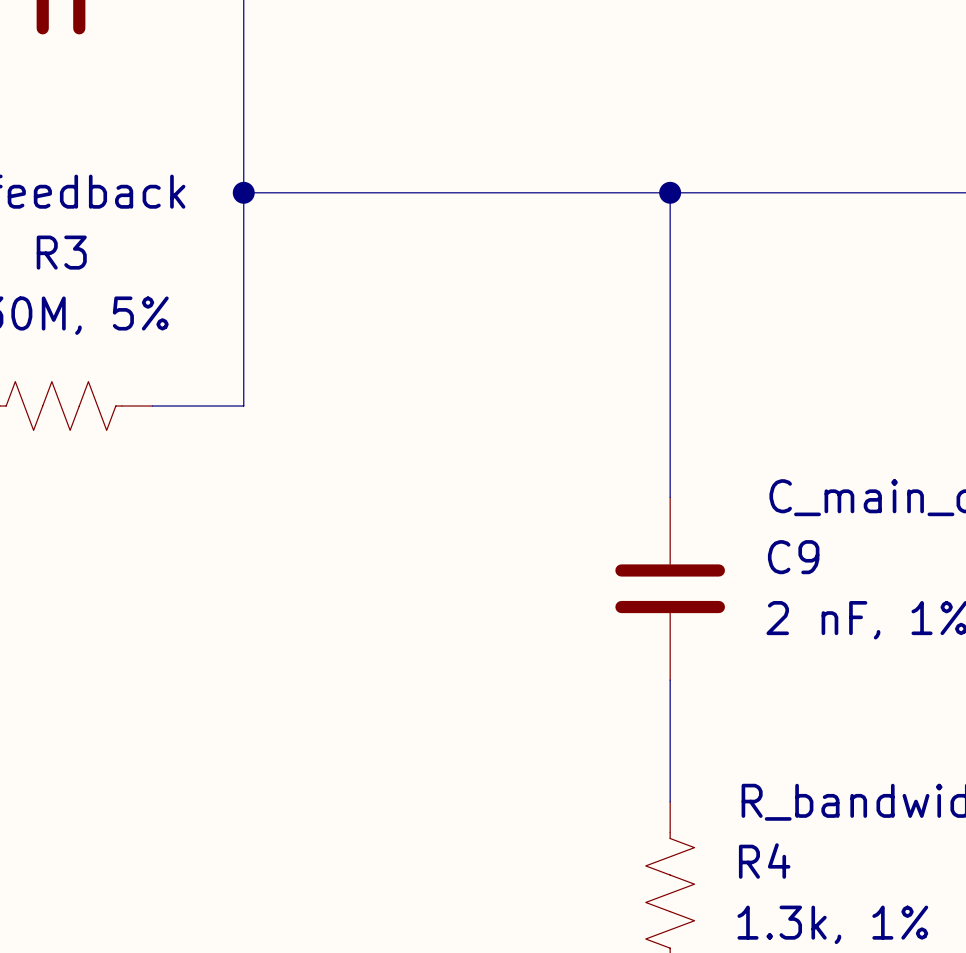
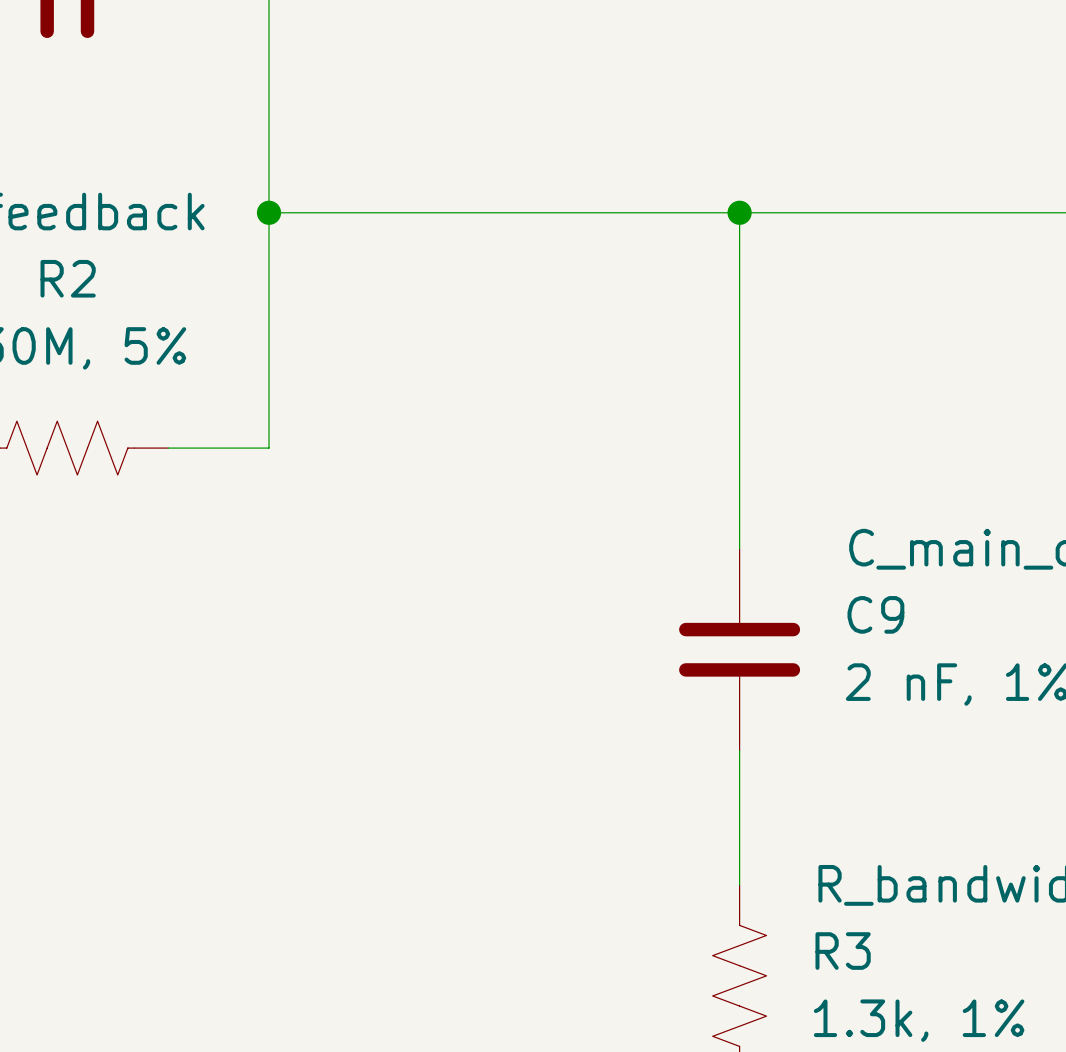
R3 name: R3 (61, 252) -> R2 (68, 278)
R4 name: R4 (764, 861) -> R3 (843, 951)

